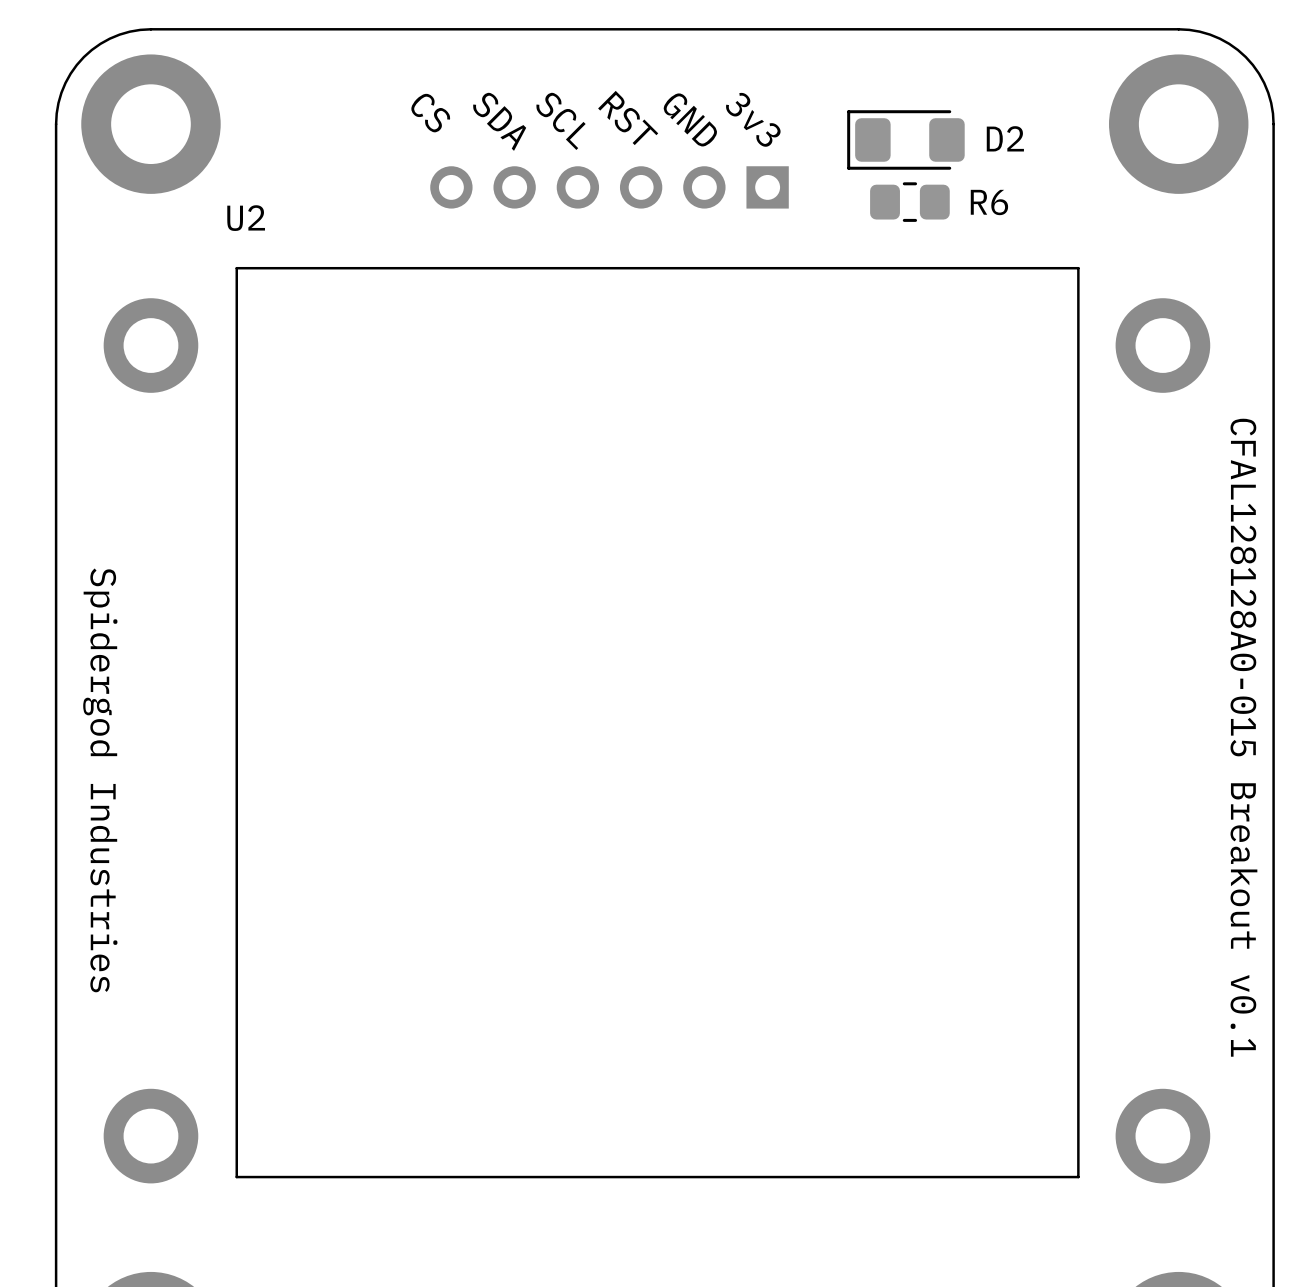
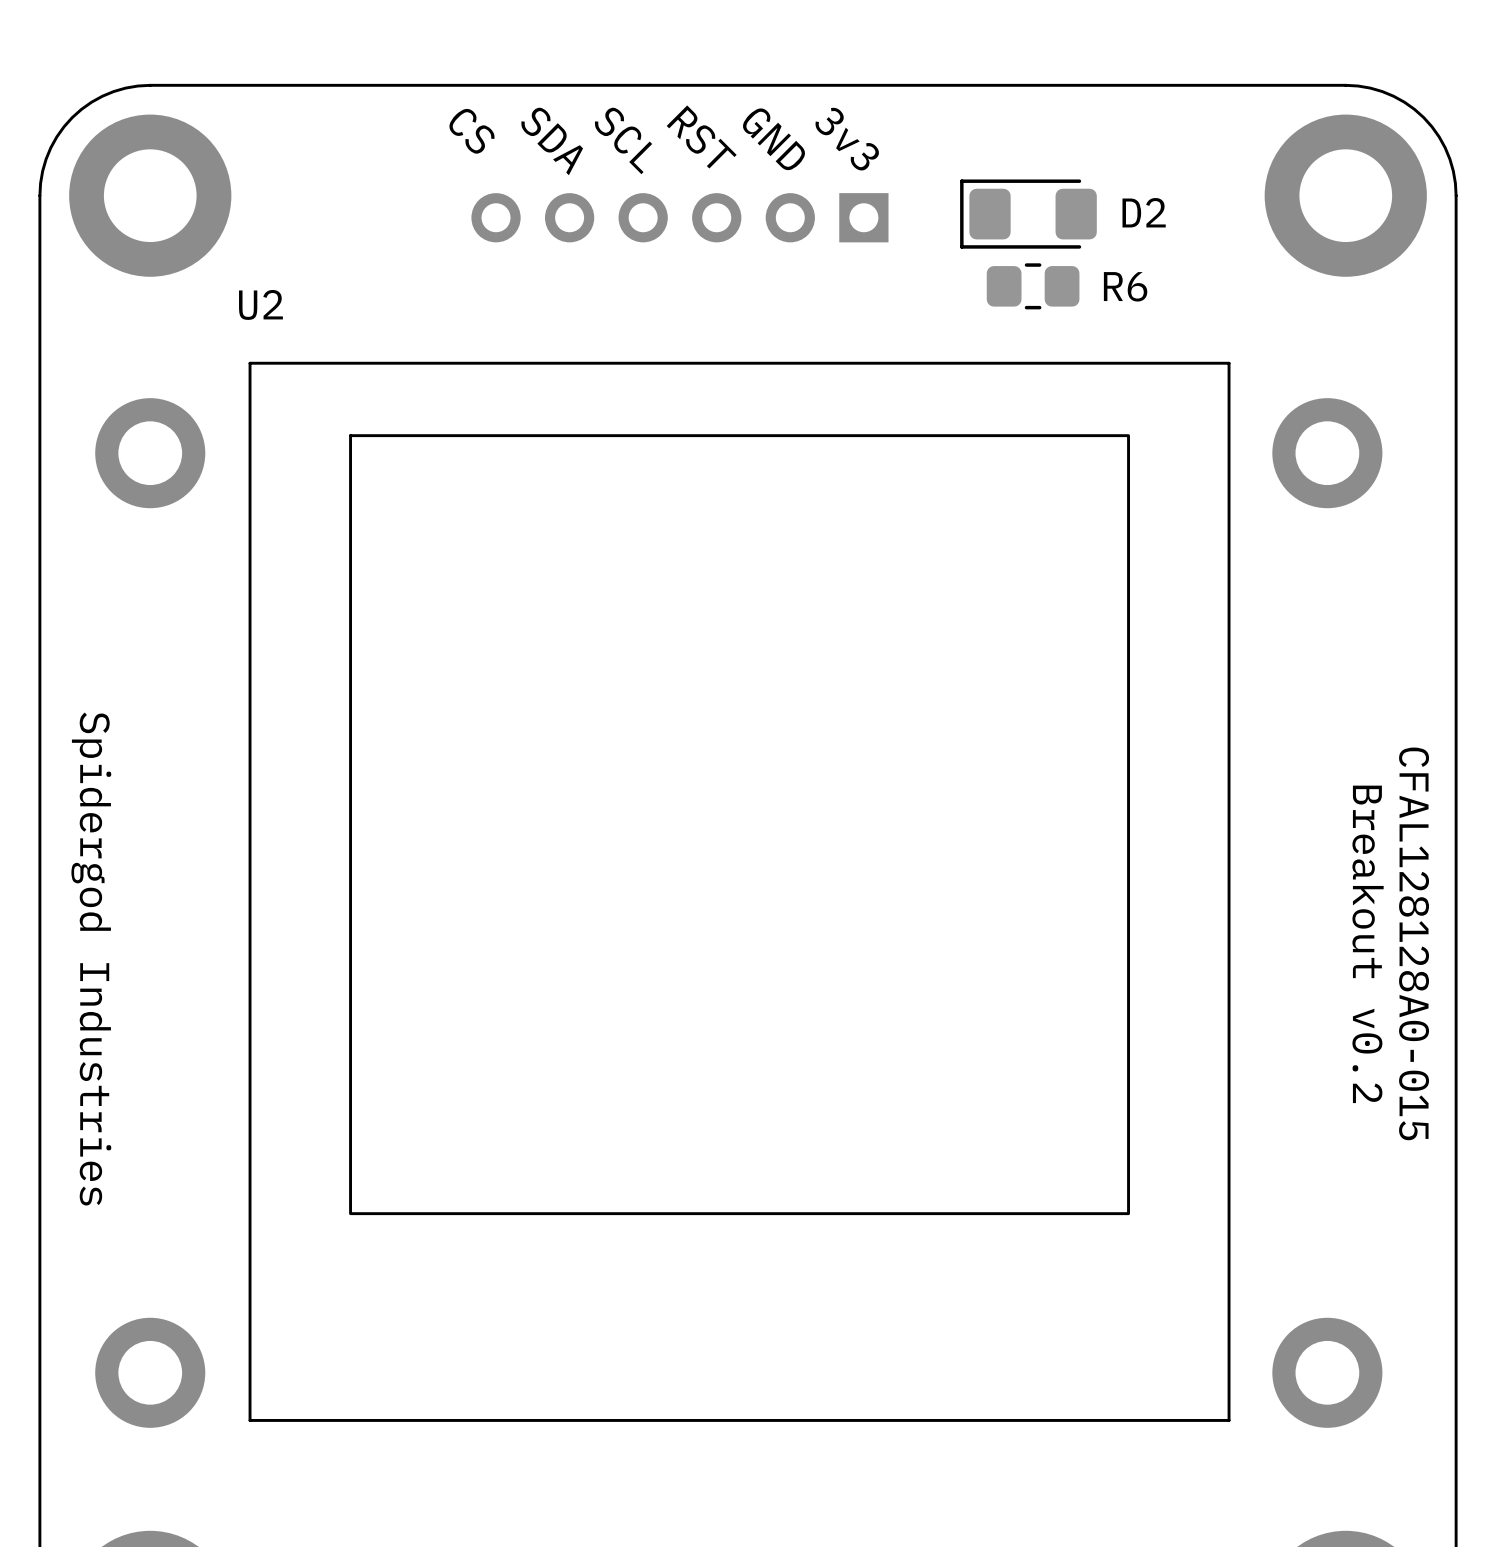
text position: CS (430, 112) -> CS (471, 131)
text position: RST (628, 117) -> RST (701, 136)
text position: GND (690, 119) -> GND (773, 139)
text position: 3v3 (753, 119) -> 3v3 (847, 139)
text position: SDA (499, 121) -> SDA (552, 141)
text position: SCL (560, 121) -> SCL (623, 140)
part position: (609, 187) -> (679, 217)
U2 footprint: [235, 266, 1080, 1179] -> [248, 361, 1231, 1422]
text: CFAL128128A0-015 Breakout v0.1 (1243, 737) -> CFAL128128A0-015 (1414, 943)
text: none -> Breakout v0.2 (1368, 944)

